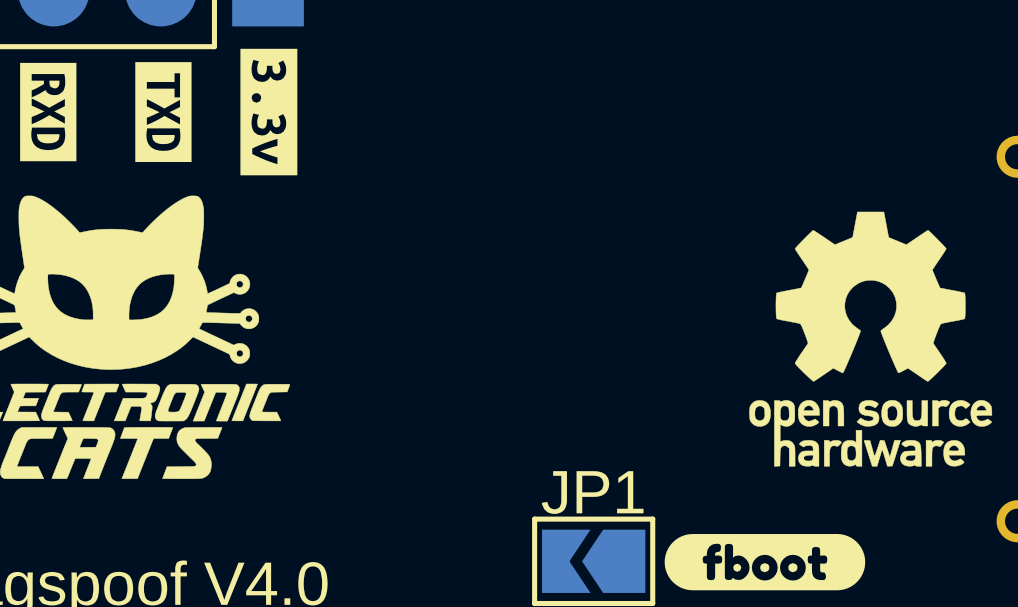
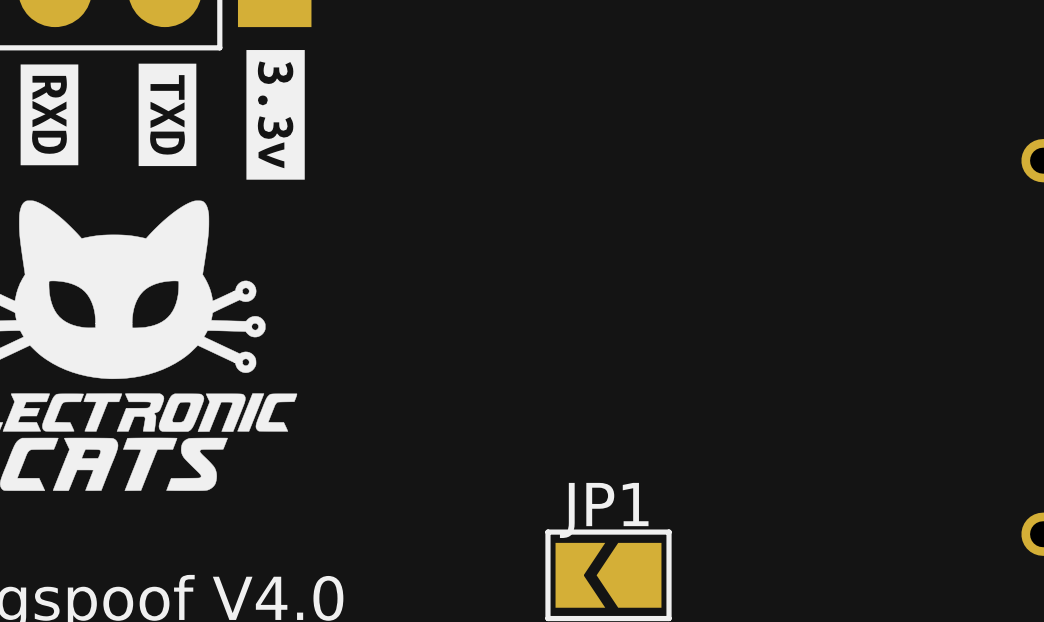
drawing: [749, 211, 993, 467] -> none
drawing: [664, 534, 866, 591] -> none

